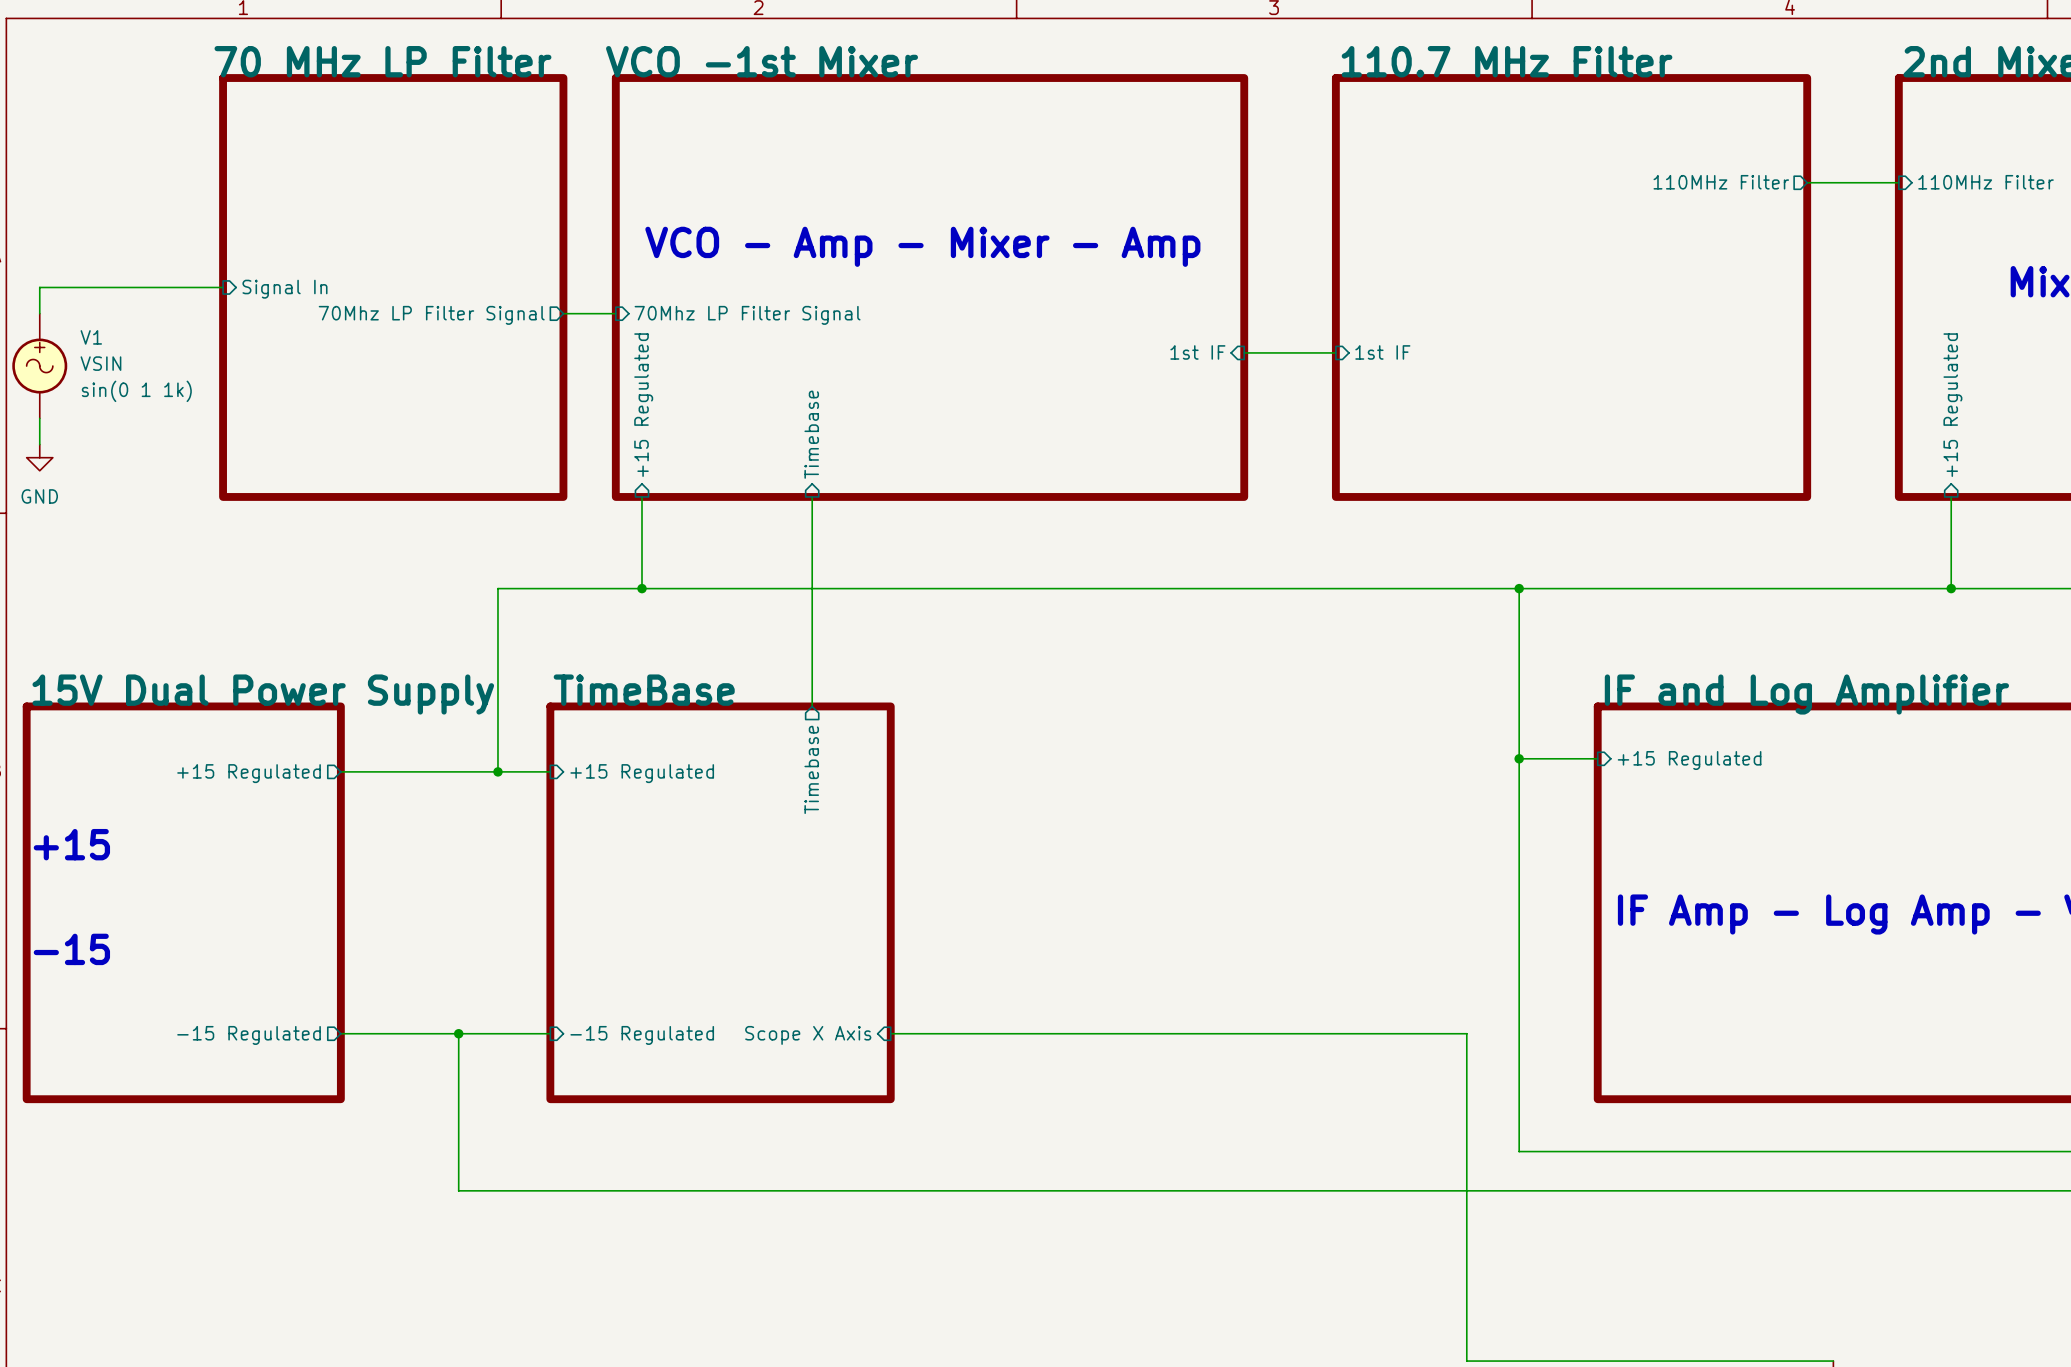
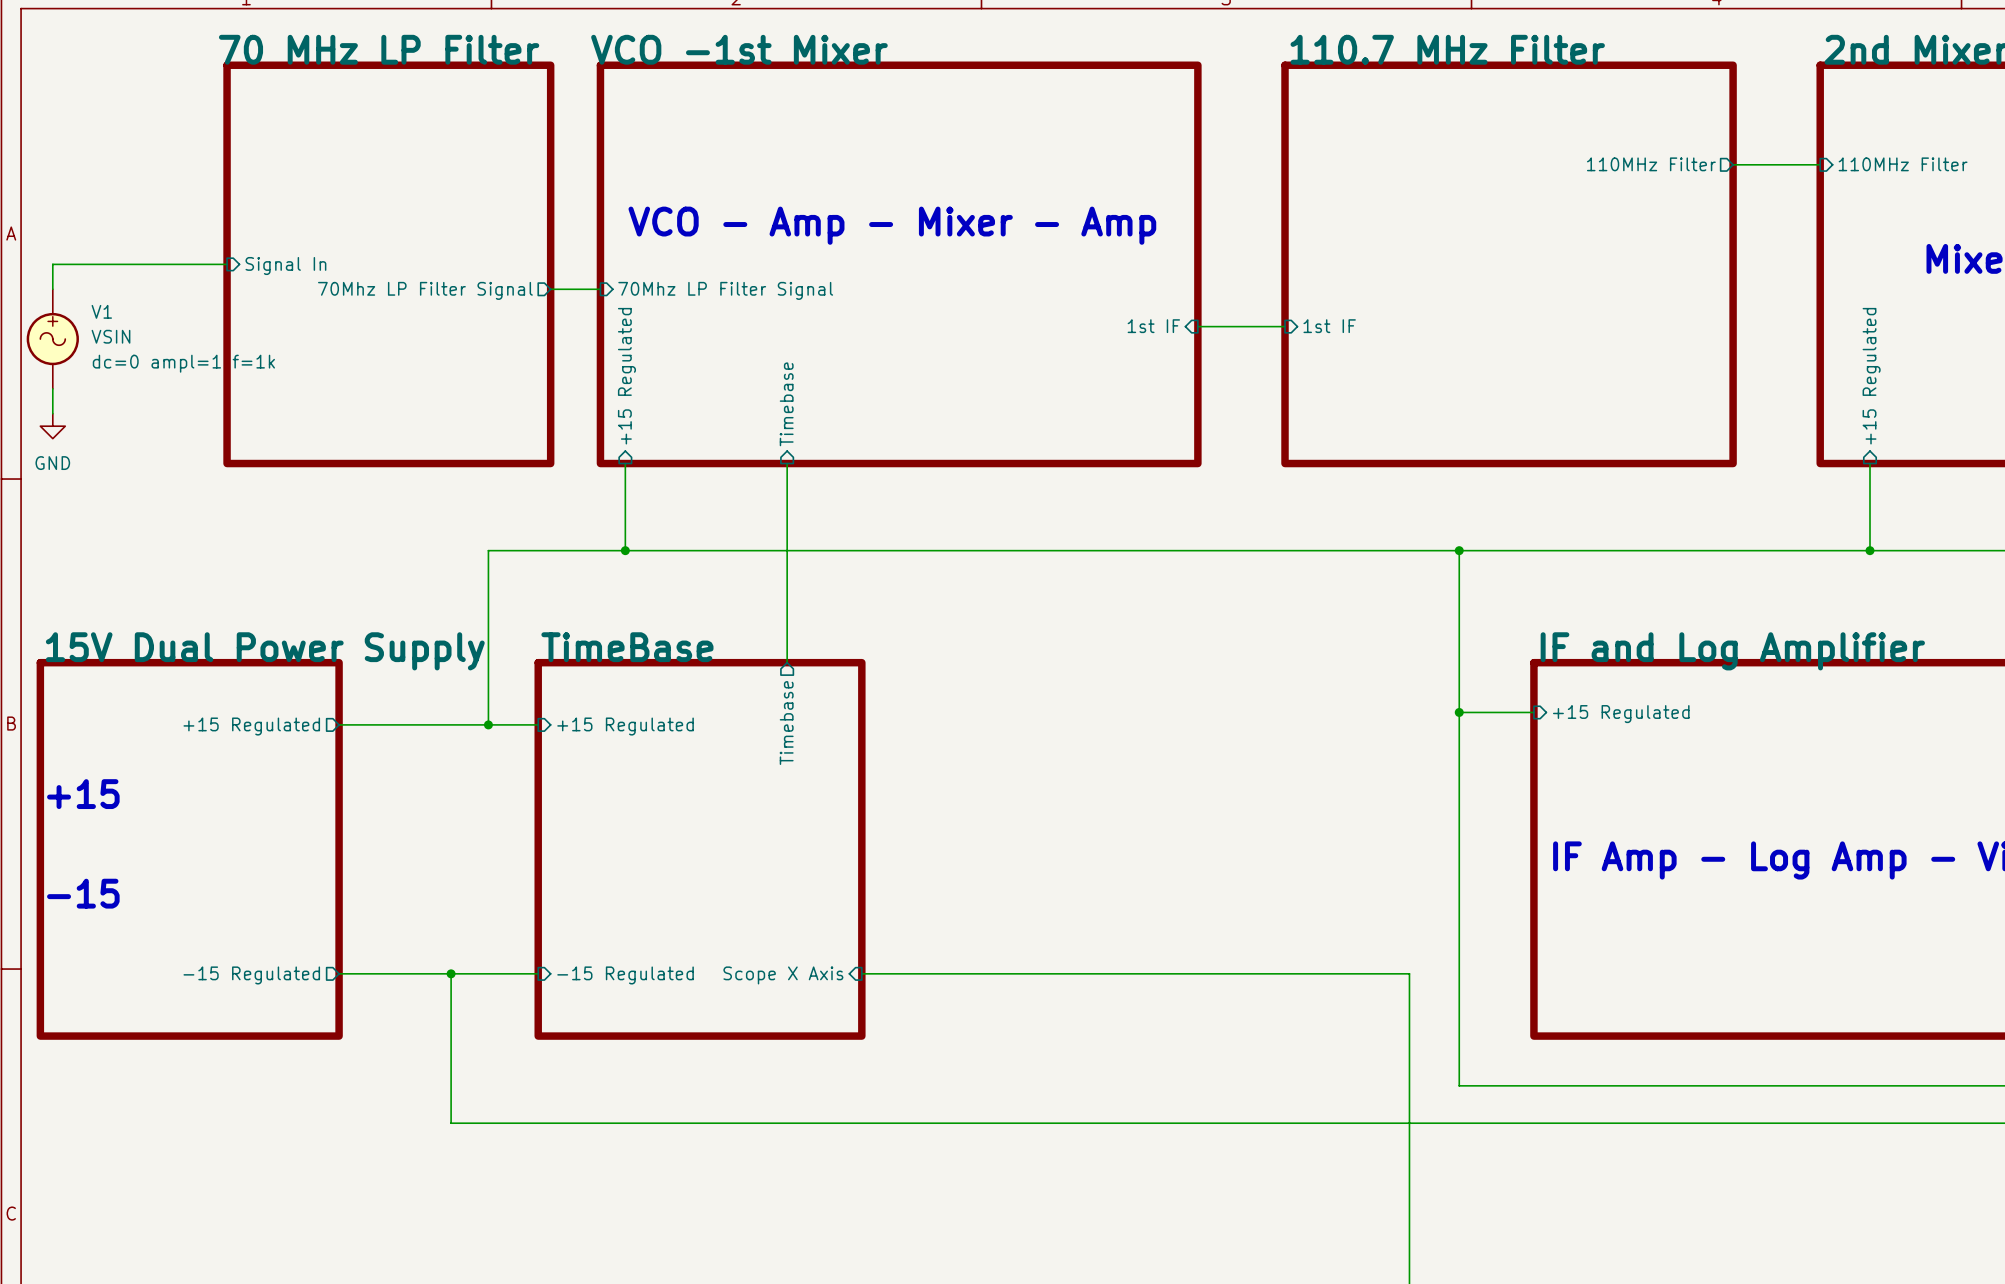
V1 text: sin(0 1 1k) (136, 391) -> none
V1 text: none -> dc=0 ampl=1 f=1k (183, 363)

